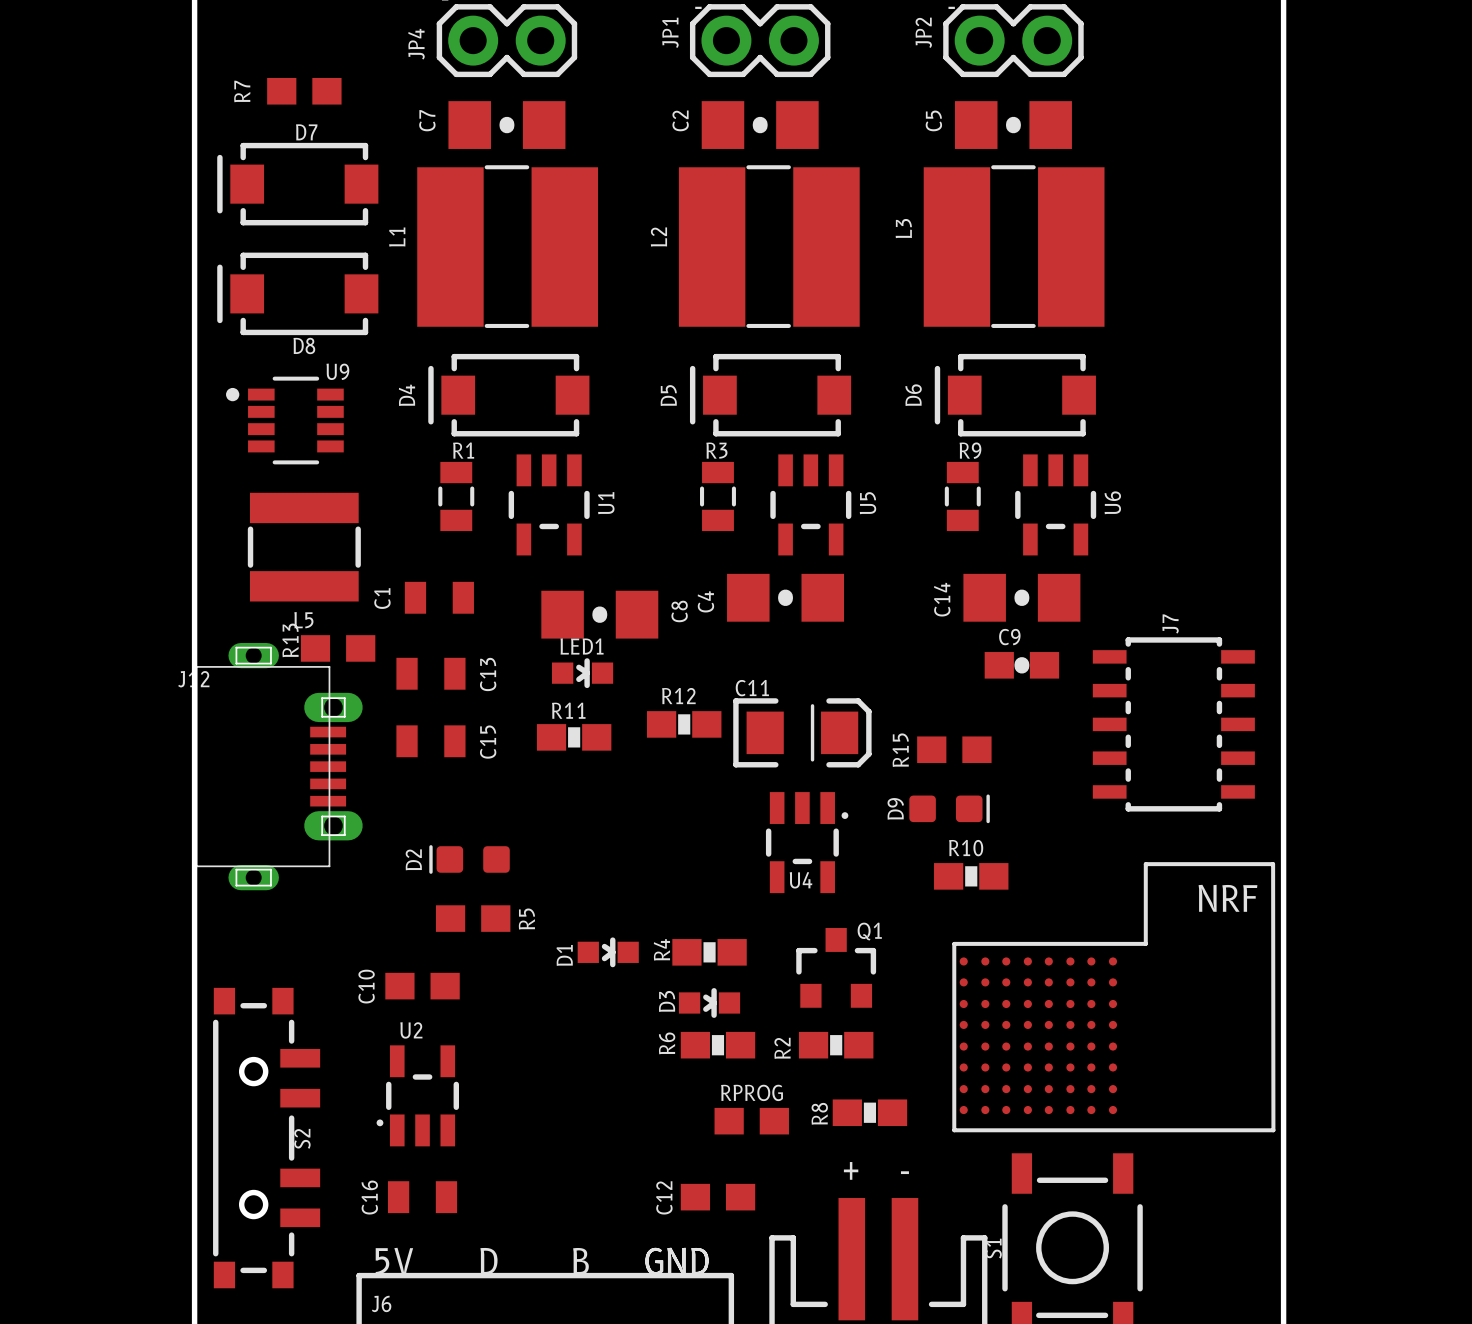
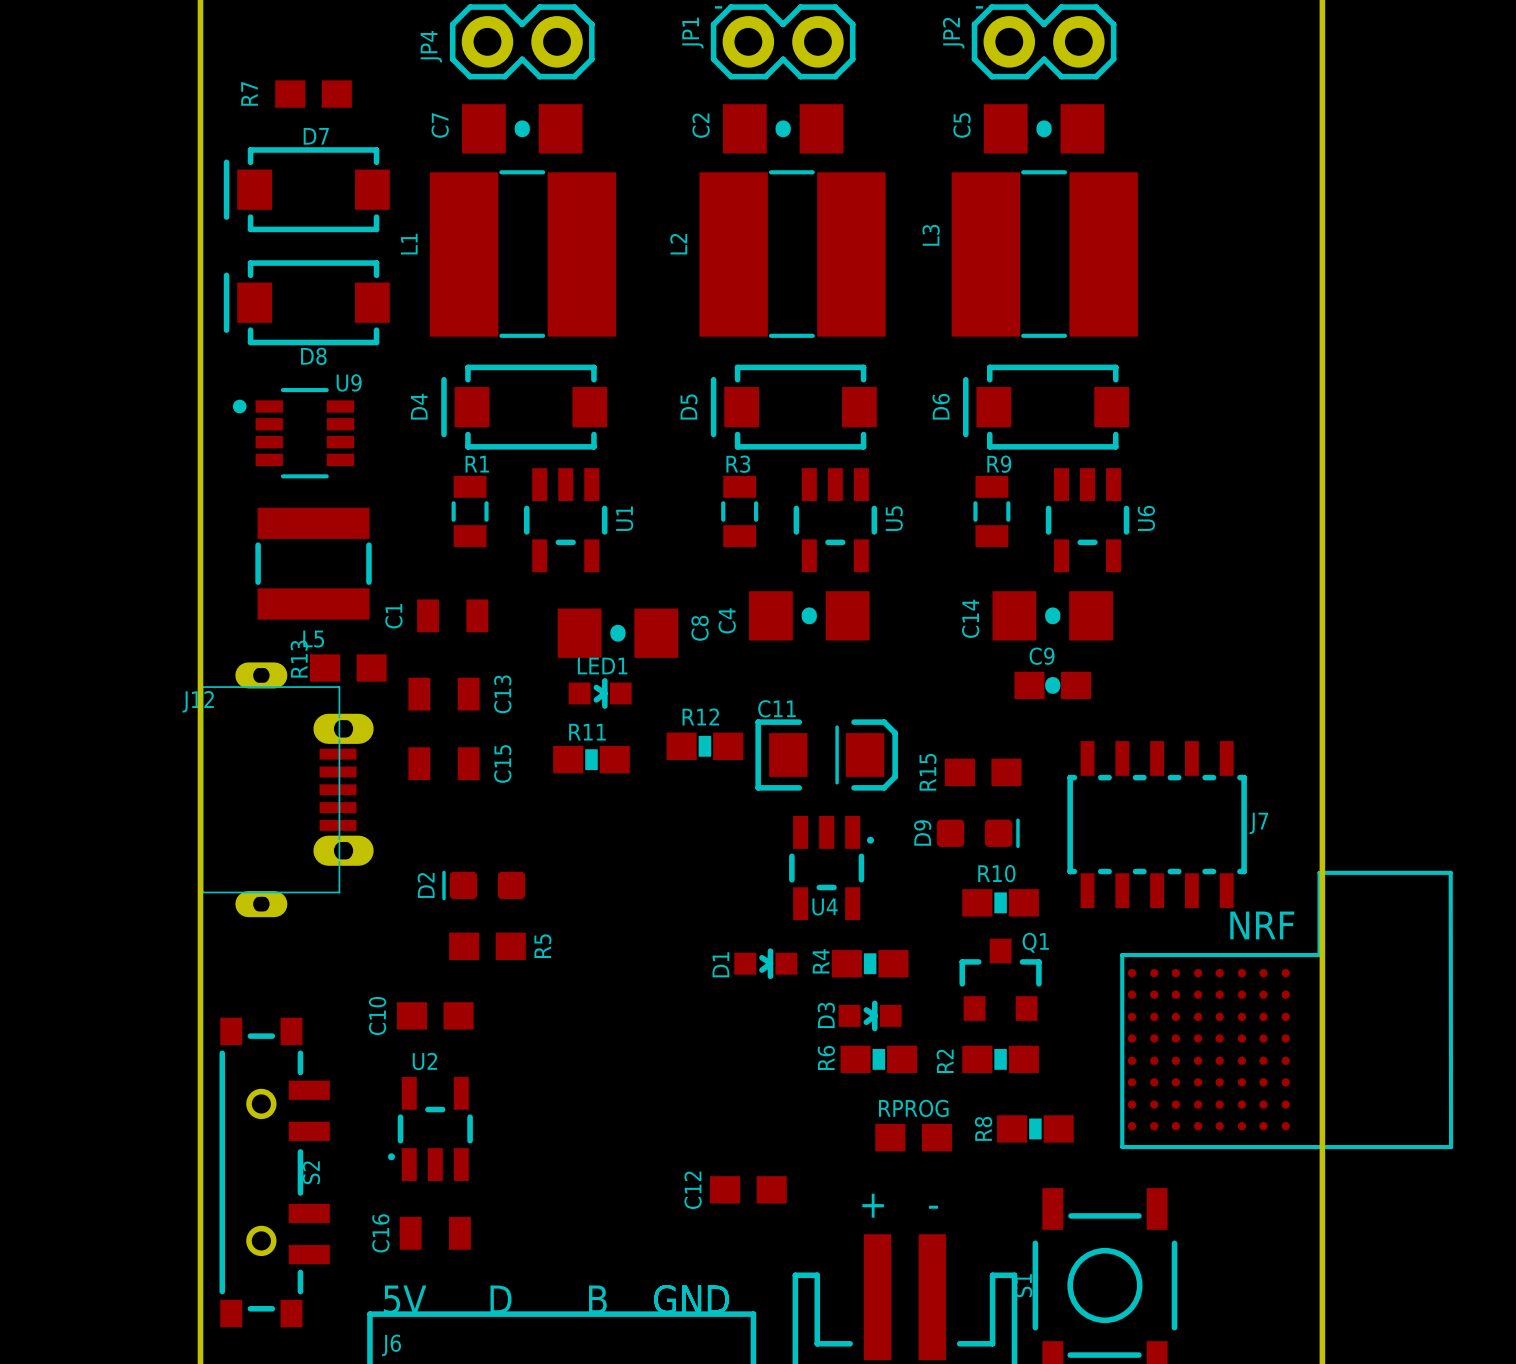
J7 rotation: 0° (1173, 724) -> 90° clockwise (1157, 824)
D1 position: (608, 952) -> (765, 963)
R4 position: (709, 952) -> (870, 963)
Q1 position: (836, 967) -> (1000, 979)
part position: (1113, 997) -> (1286, 1009)
D3 position: (709, 1002) -> (870, 1015)
R6 position: (717, 1045) -> (878, 1059)
R2 position: (836, 1045) -> (1000, 1059)
R8 position: (869, 1112) -> (1035, 1128)
RPROG position: (751, 1121) -> (913, 1137)
C12 position: (717, 1197) -> (748, 1189)

